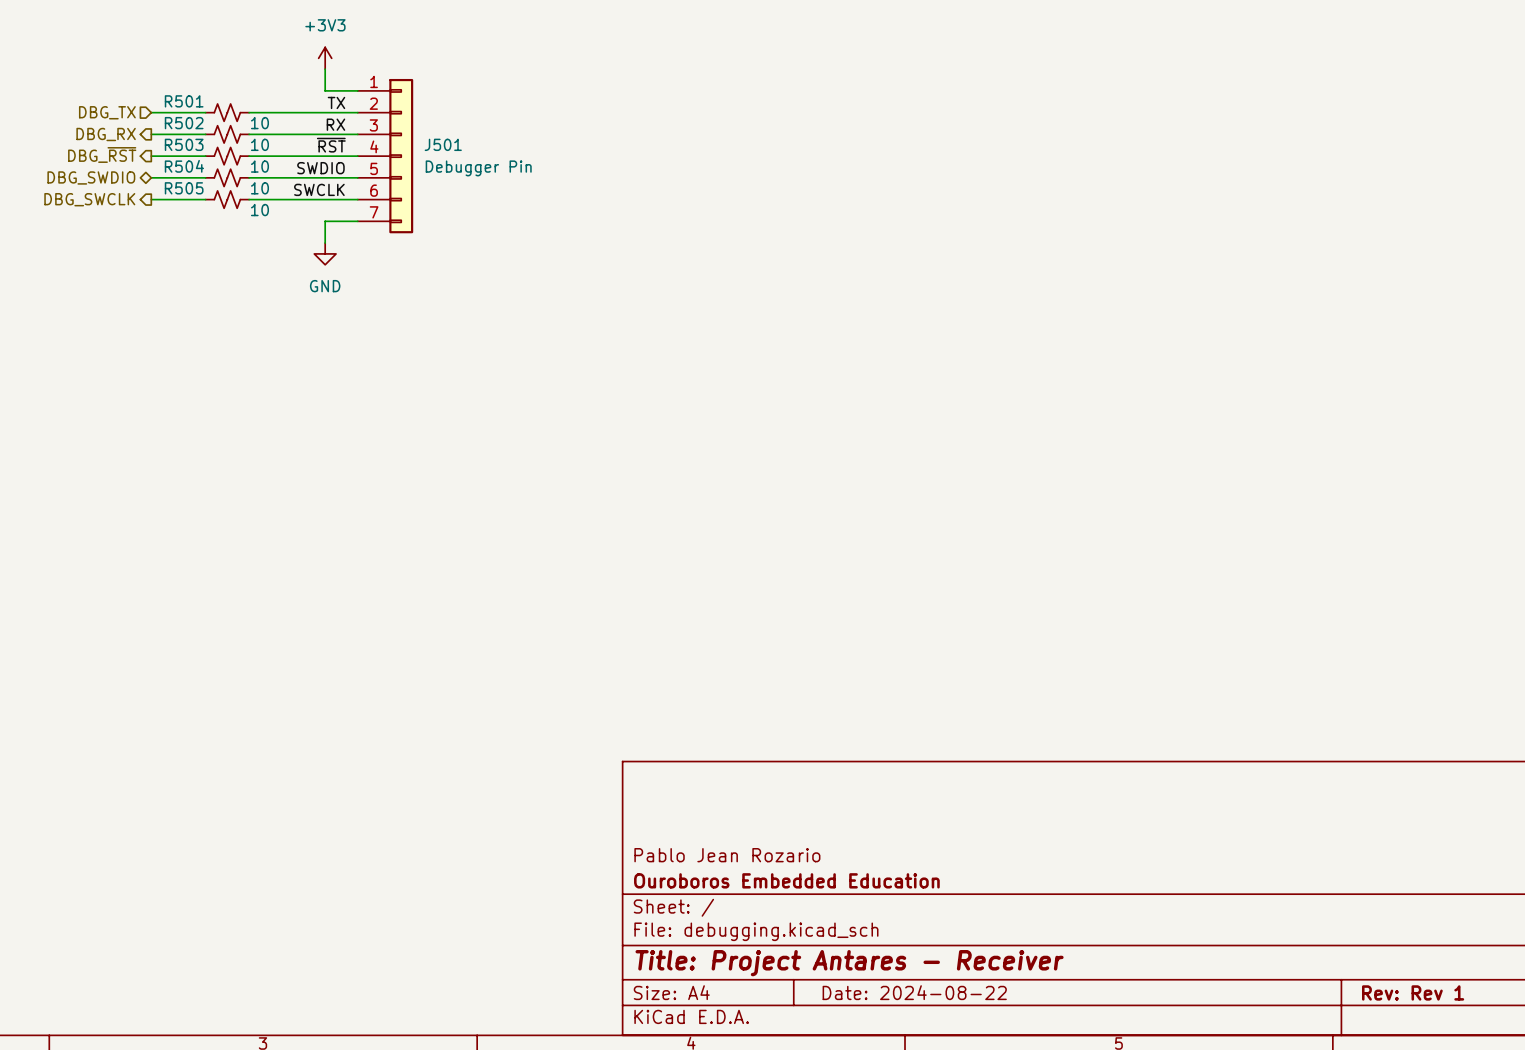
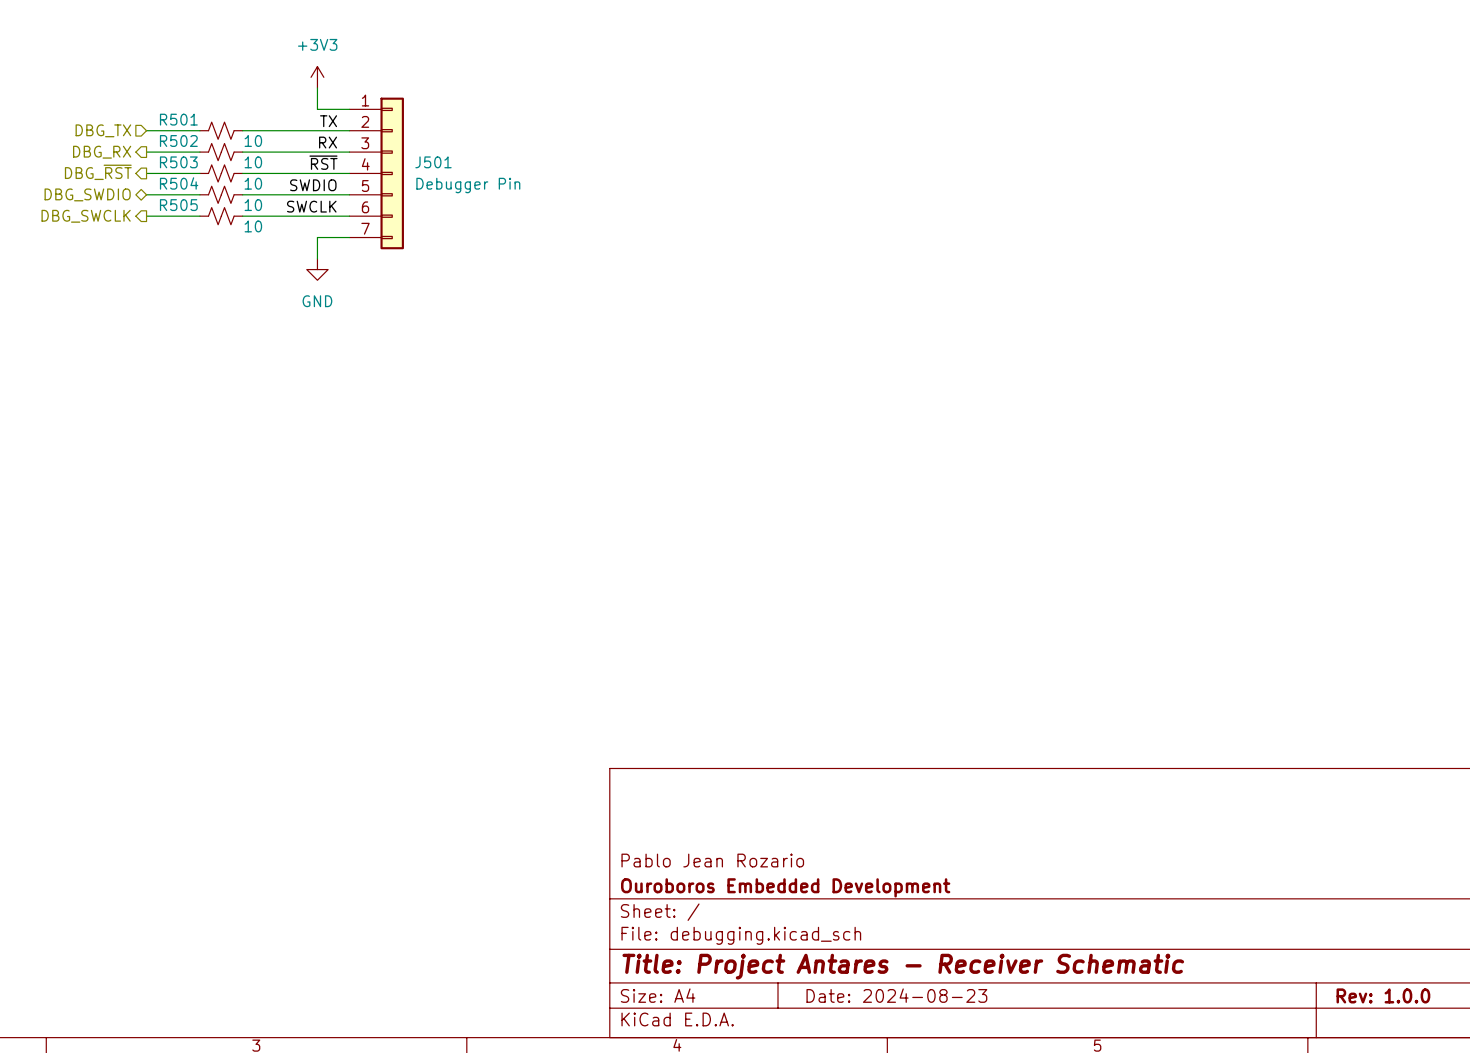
title block: Ouroboros Embedded Education (786, 880) -> Ouroboros Embedded Development (785, 887)
title block: Title: Project Antares - Receiver (849, 963) -> Title: Project Antares - Receiver Schematic (903, 966)
title block: Date: 2024-08-22 (914, 992) -> Date: 2024-08-23 (896, 995)
title block: Rev: Rev 1 (1413, 992) -> Rev: 1.0.0 (1383, 995)

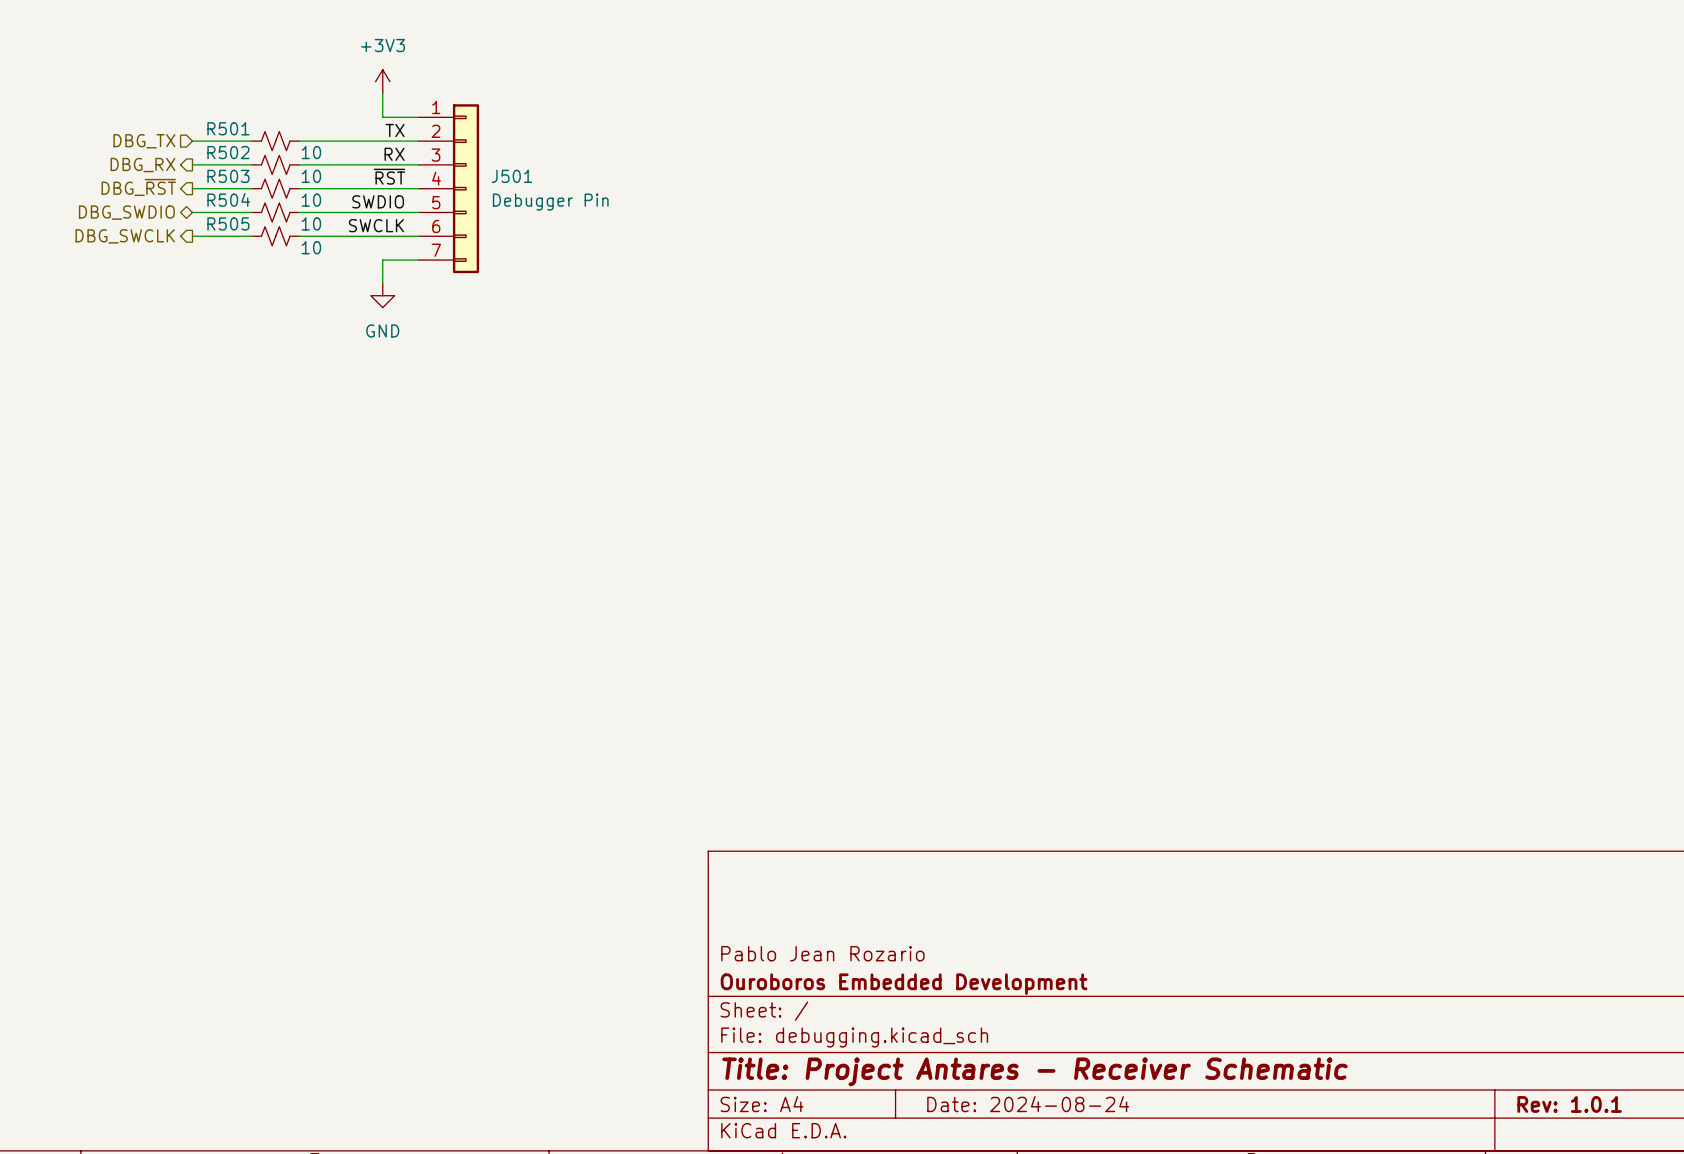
title block: Date: 2024-08-23 (896, 995) -> Date: 2024-08-24 (1028, 1104)
title block: Rev: 1.0.0 (1383, 995) -> Rev: 1.0.1 (1569, 1104)

